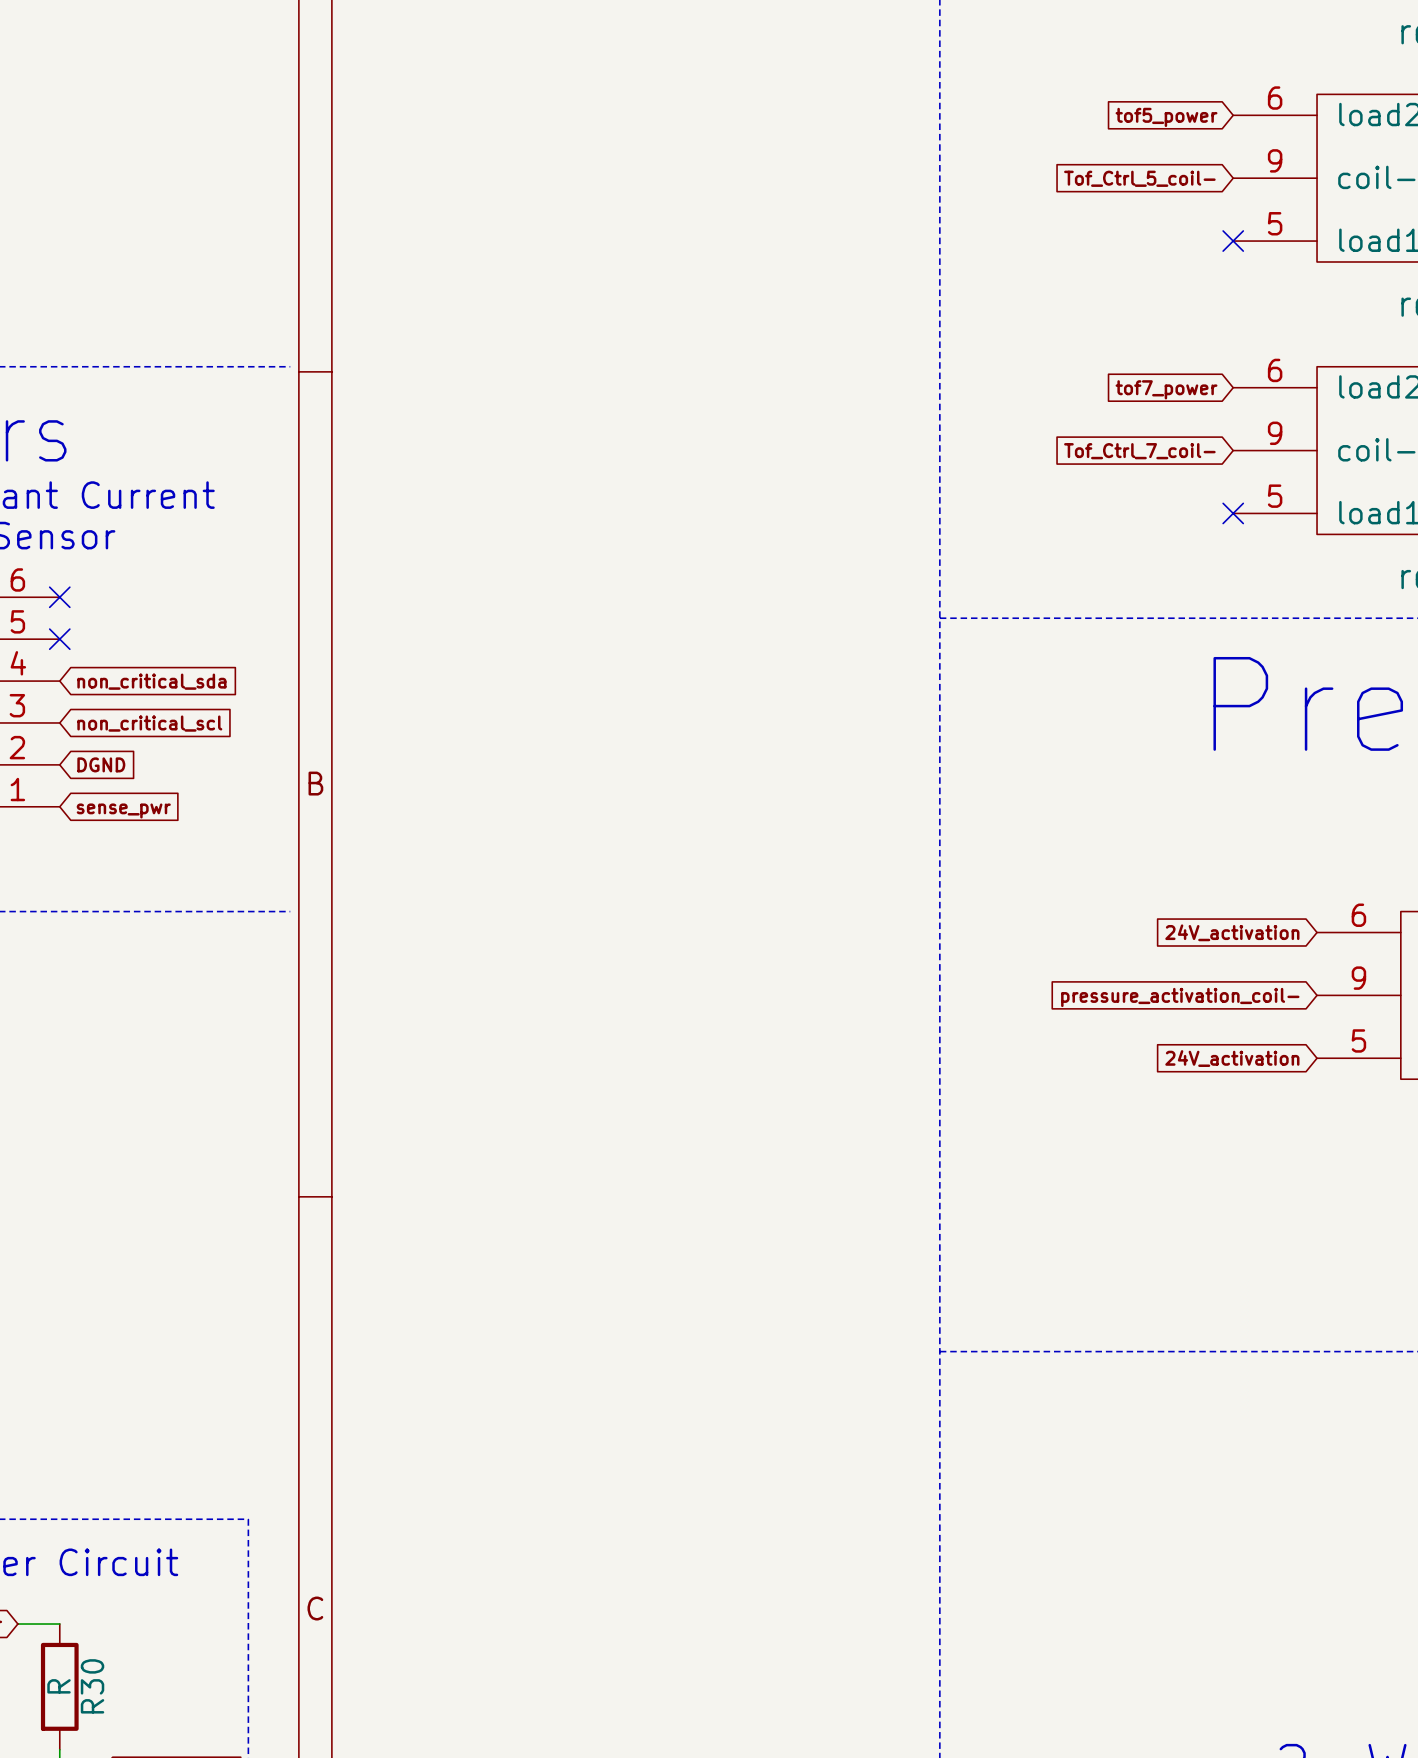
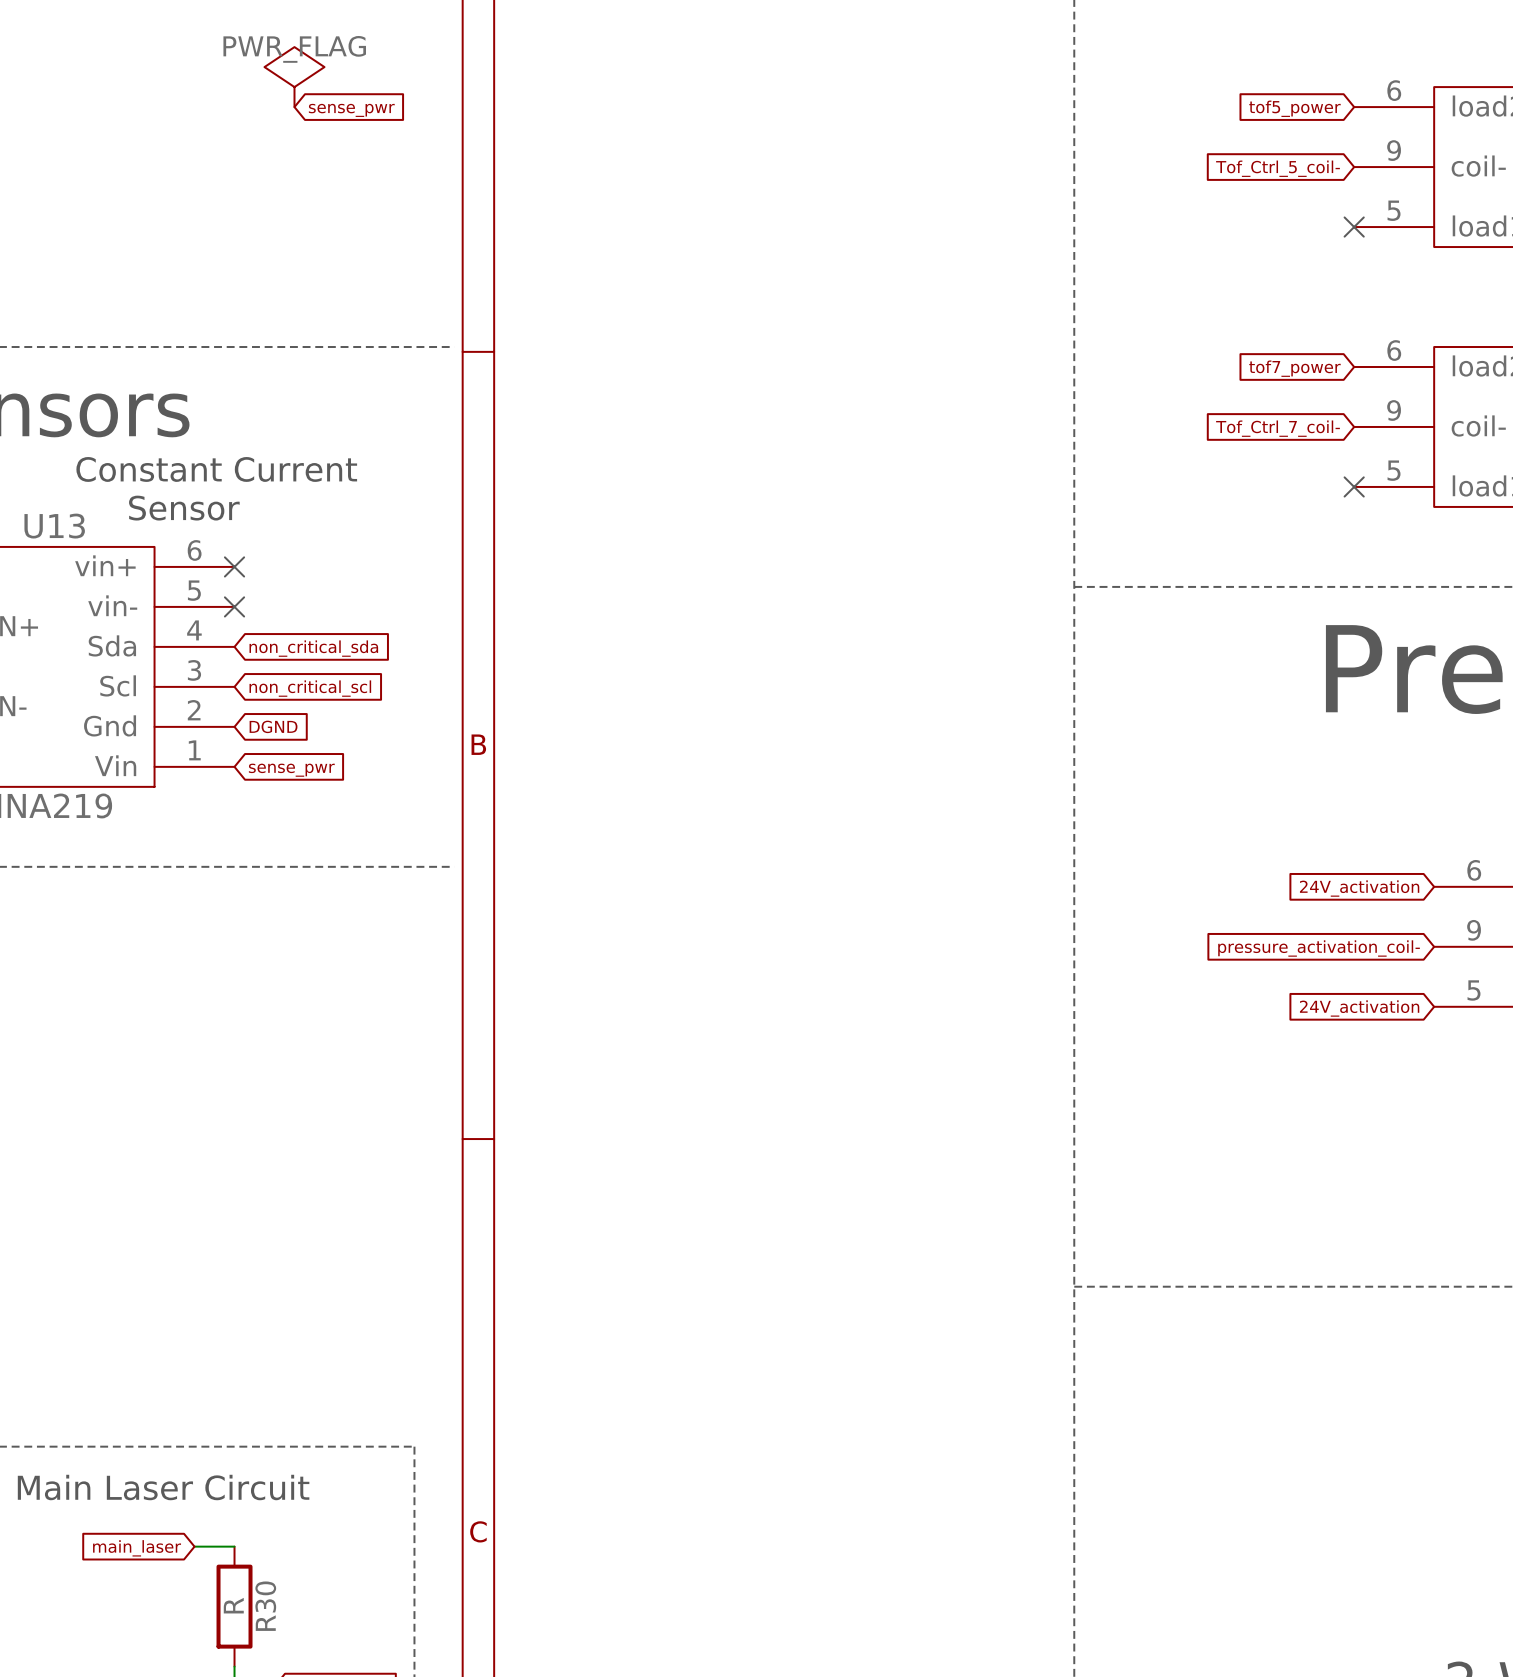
power symbol: none -> PWR_FLAG (294, 77)
global label: none -> sense_pwr (351, 110)

